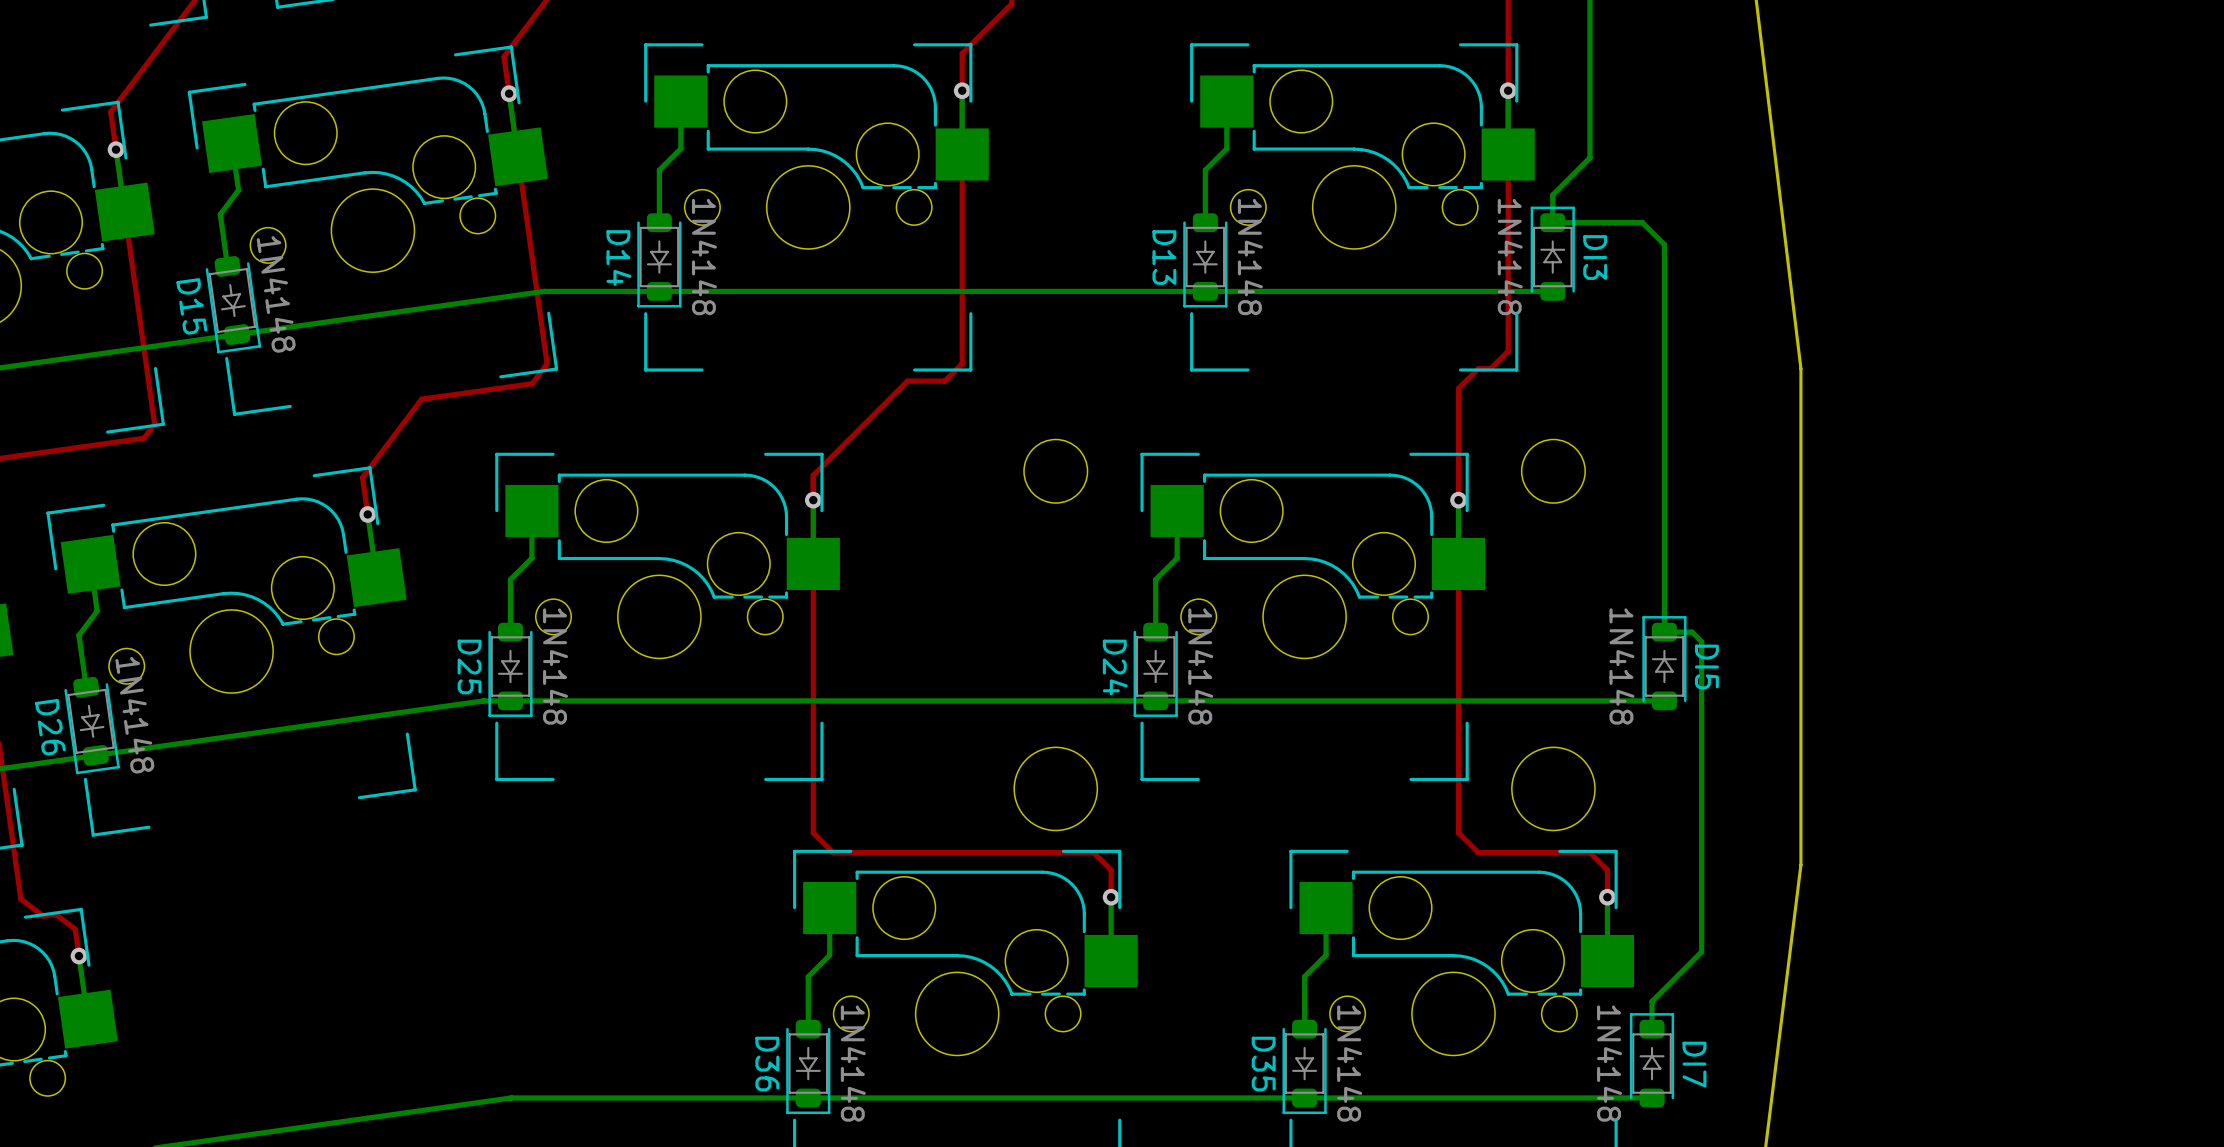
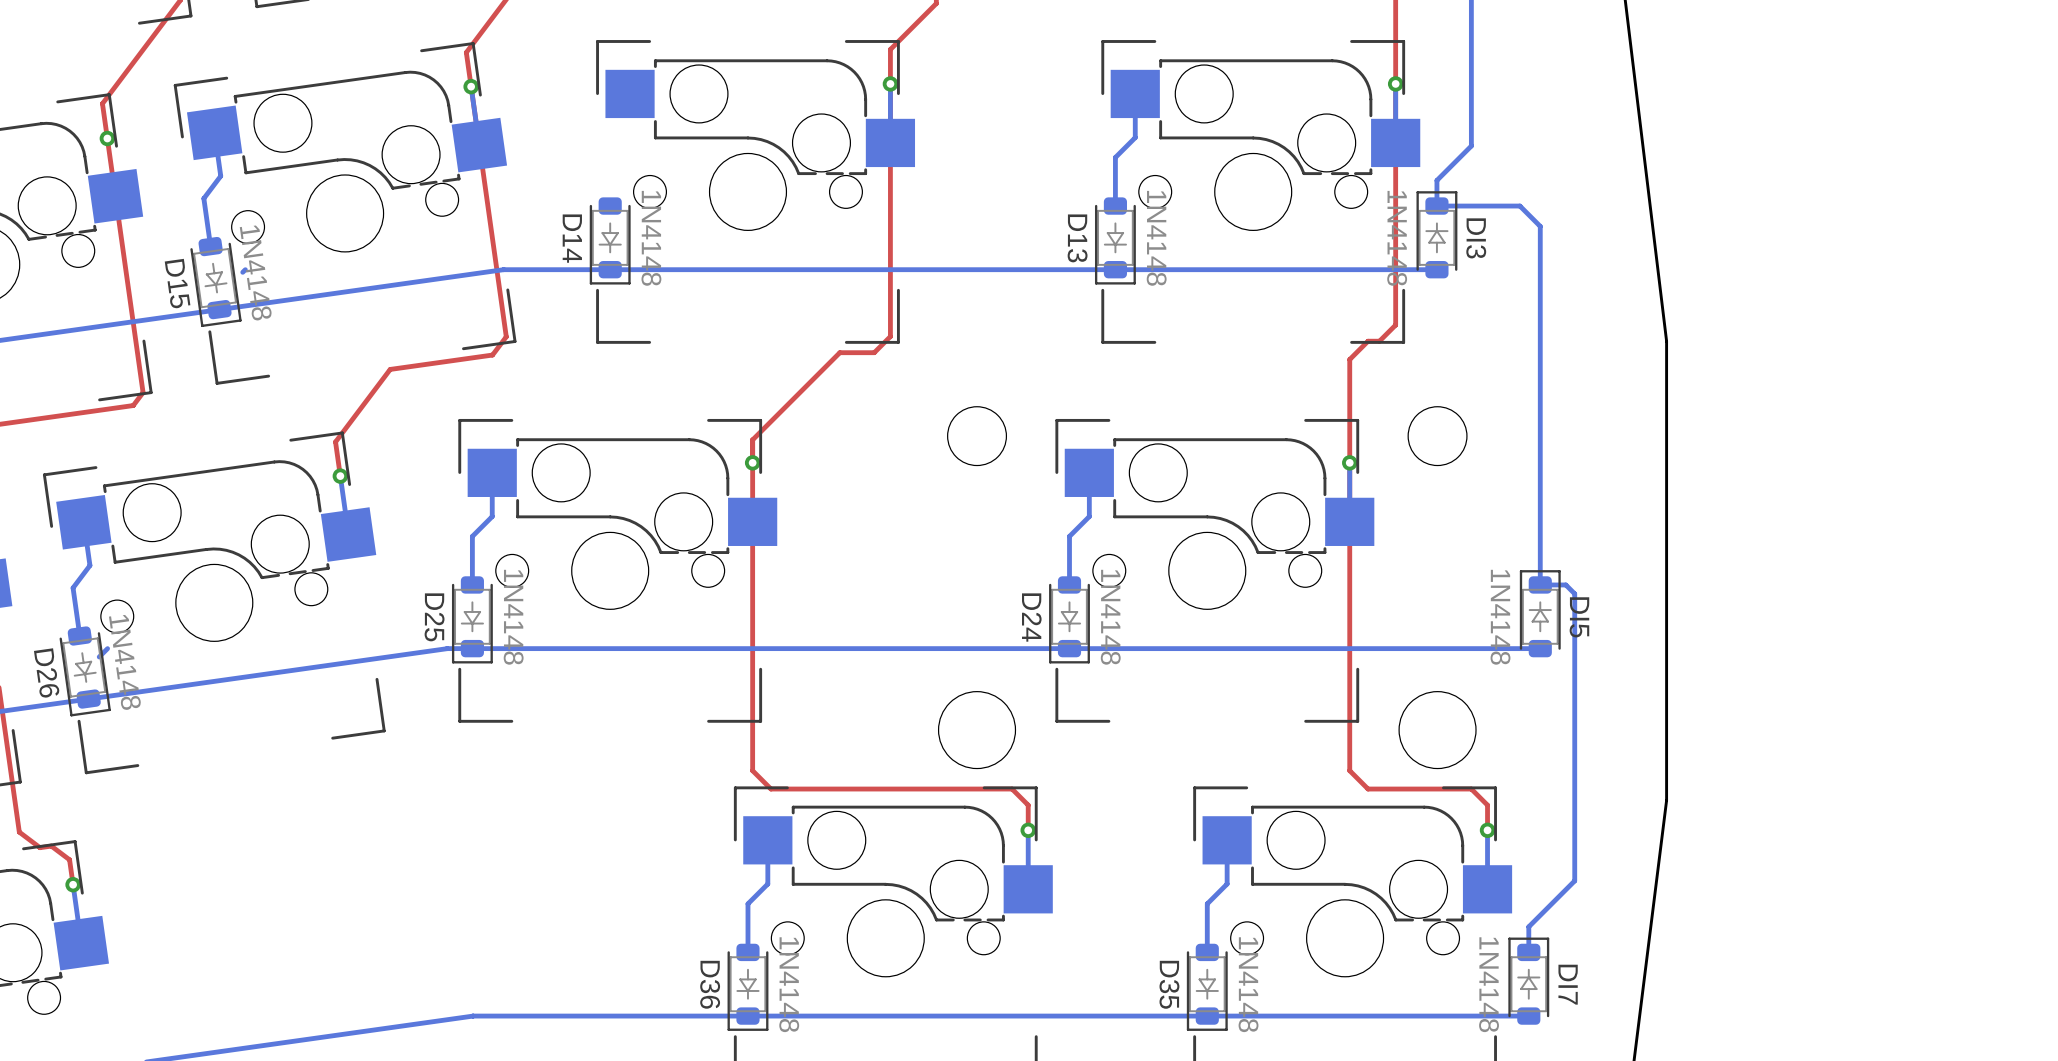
bottom track: (680, 101) (680, 148) (659, 170) (659, 222) -> none
bottom track: (116, 149) (124, 212) -> none
bottom track: none -> (245, 269) (242, 272)
bottom track: (813, 500) (813, 563) -> none
bottom track: none -> (107, 648) (99, 656)

